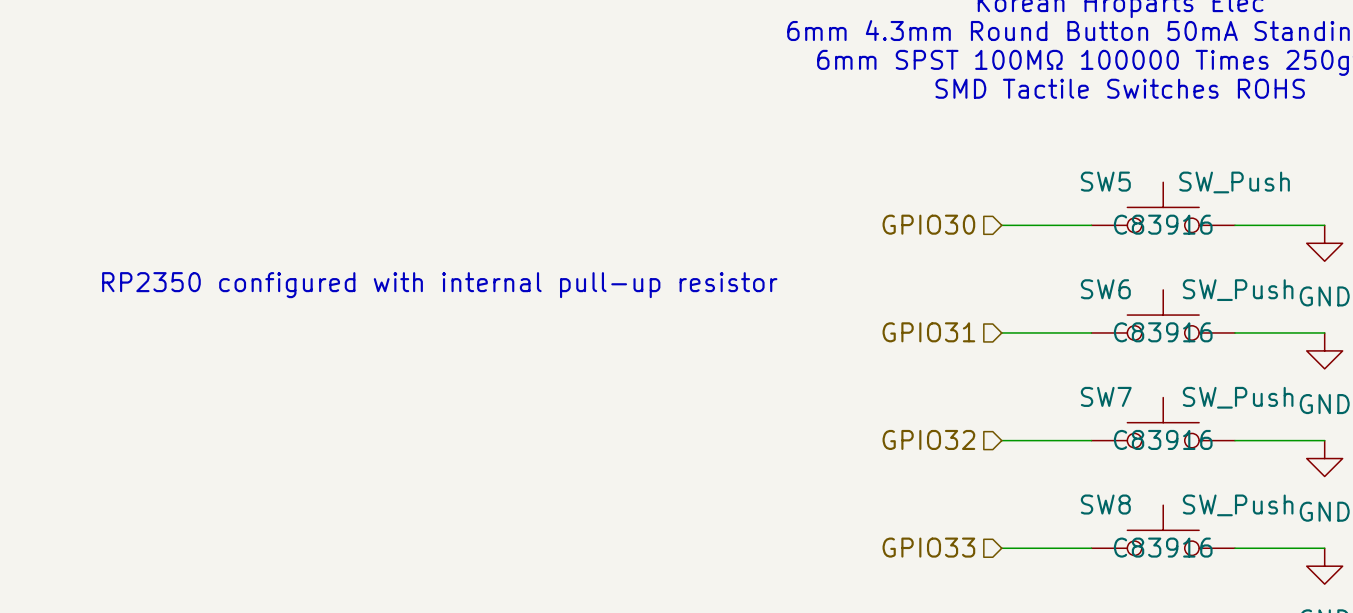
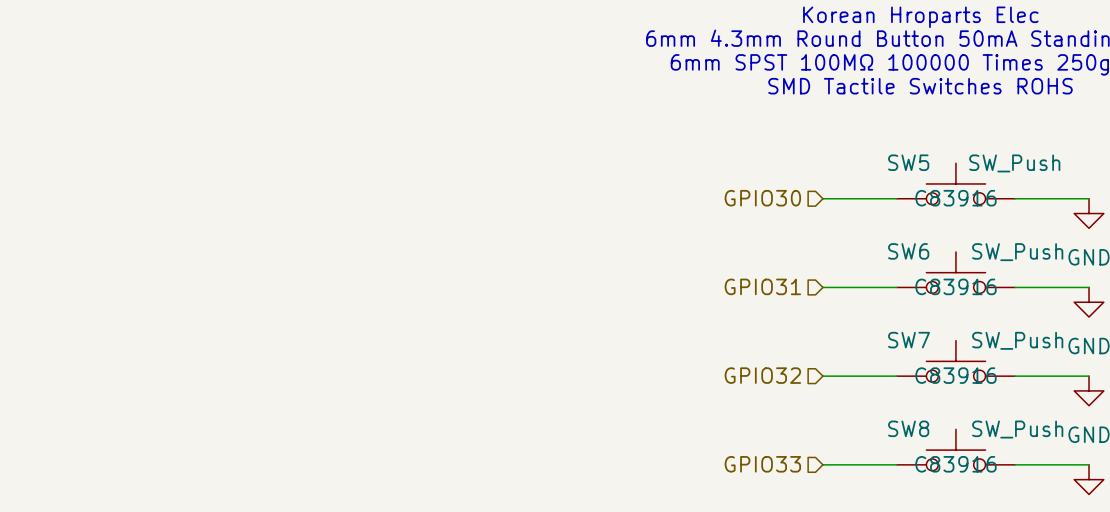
text: RP2350 configured with internal pull-up resistor (439, 285) -> none

